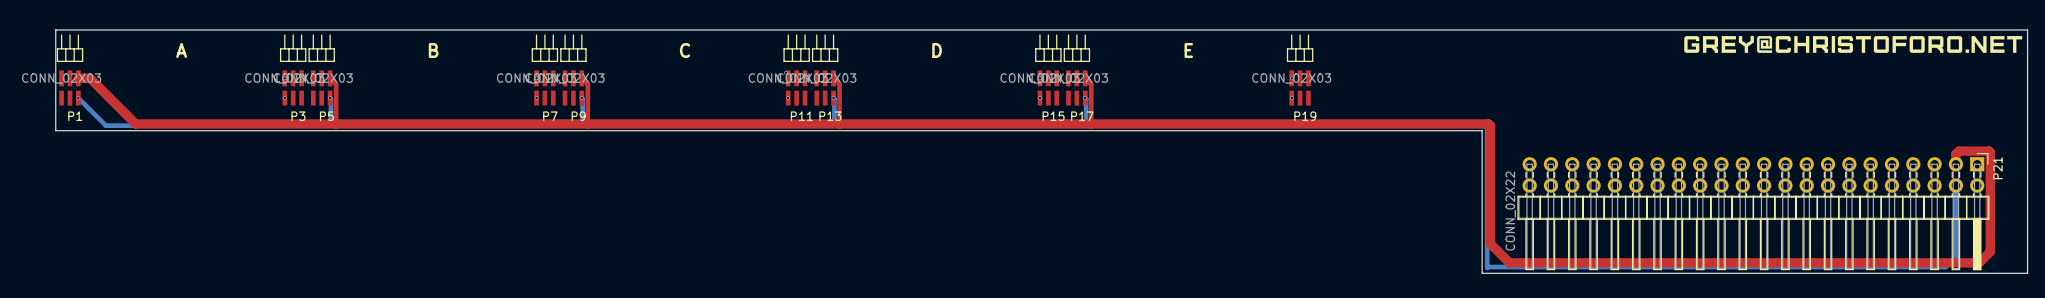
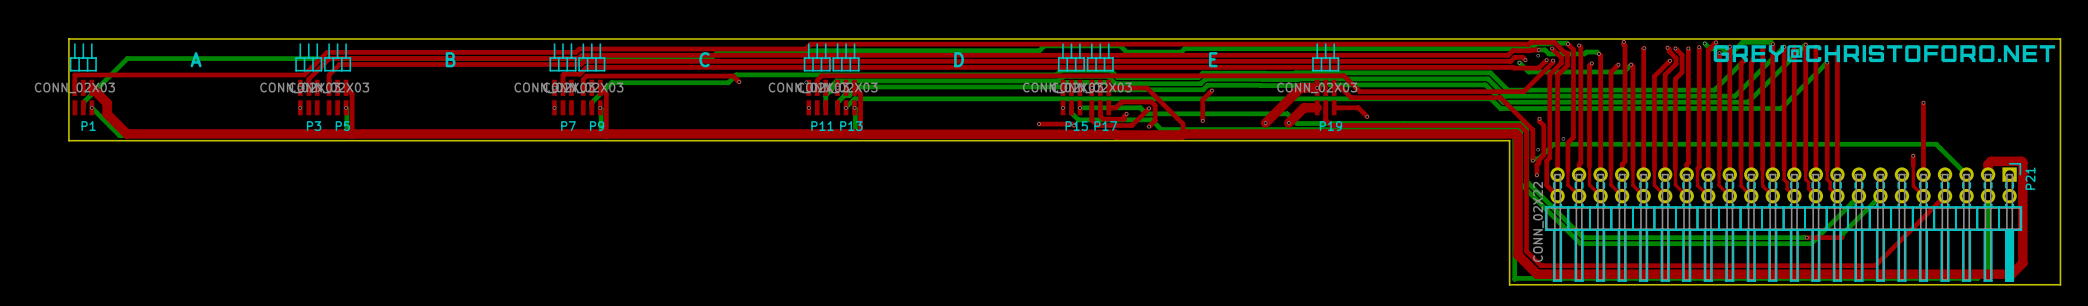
top track: none -> (1623, 41) (1625, 161) (1622, 164) (1622, 174)
via: none -> (1623, 41)
top track: none -> (1715, 42) (1708, 50) (1708, 174)
via: none -> (1715, 42)
bottom track: none -> (1704, 43) (1710, 48) (1721, 47) (1726, 52) (1732, 52) (1742, 42) (1770, 42) (1772, 44)
via: none -> (1704, 43)
bottom track: none -> (1567, 44) (1536, 43) (1532, 48) (1184, 48) (1181, 52) (1127, 53) (1120, 45) (1044, 45) (1039, 50) (719, 50) (711, 58) (127, 58) (83, 102) (83, 107)
top track: none -> (1567, 44) (1573, 49) (1573, 137) (1567, 142) (1567, 184) (1579, 196)
via: none -> (1567, 44)
top track: none -> (1772, 44) (1772, 174)
via: none -> (1772, 44)
bottom track: none -> (1805, 44) (1748, 102) (1502, 102) (1485, 84) (1207, 85) (1203, 89) (1112, 89) (1105, 82) (1066, 82) (1061, 86) (858, 86) (849, 95) (844, 95) (837, 102) (837, 107)
top track: none -> (1805, 44) (1805, 169)
via: none -> (1805, 44)
top track: none -> (1579, 45) (1580, 47) (1580, 162) (1579, 174)
via: none -> (1579, 45)
top track: none -> (1729, 46) (1729, 174)
via: none -> (1729, 46)
bottom track: none -> (1784, 46) (1735, 96) (1505, 96) (1488, 78) (1205, 79) (1200, 83) (1115, 83) (1108, 76) (1063, 76) (1059, 80) (836, 80) (825, 95) (825, 107)
top track: none -> (1784, 46) (1783, 169)
via: none -> (1784, 46)
top track: none -> (1794, 46) (1794, 174)
top track: none -> (1815, 46) (1815, 174)
top track: none -> (1667, 47) (1676, 58) (1676, 63) (1665, 74) (1665, 174)
via: none -> (1667, 47)
top track: none -> (1699, 47) (1699, 166) (1697, 168) (1697, 185) (1708, 196)
via: none -> (1699, 47)
top track: none -> (1762, 47) (1762, 169)
top track: none -> (1552, 48) (1561, 57) (1561, 63) (1549, 74) (1549, 157) (1546, 160) (1546, 185) (1557, 196)
via: none -> (1552, 48)
top track: none -> (1644, 48) (1643, 174)
via: none -> (1644, 48)
top track: none -> (1675, 48) (1682, 55) (1682, 72) (1675, 79) (1675, 184) (1686, 196)
via: none -> (1675, 48)
top track: none -> (1688, 48) (1688, 162) (1686, 174)
via: none -> (1688, 48)
bottom track: none -> (1538, 49) (1545, 49) (1549, 53) (1584, 53) (1586, 52) (1597, 52) (1598, 53)
top track: none -> (1538, 49) (1512, 50) (1508, 55) (581, 55) (578, 58) (329, 58) (308, 79) (308, 87)
via: none -> (1538, 49)
top track: none -> (1837, 51) (1837, 174)
top track: none -> (1719, 53) (1719, 185) (1729, 196)
via: none -> (1719, 53)
top track: none -> (1598, 53) (1600, 55) (1600, 174)
via: none -> (1598, 53)
via: none -> (1538, 55)
bottom track: none -> (1745, 59) (1714, 90) (1507, 90) (1490, 72) (1202, 73) (1198, 77) (1117, 77) (1110, 70) (1061, 70) (1056, 74) (736, 74) (728, 82) (611, 82) (591, 102) (591, 107)
top track: none -> (1745, 59) (1741, 63) (1741, 185) (1751, 196)
top track: none -> (1752, 59) (1751, 174)
top track: none -> (1525, 60) (1522, 57) (1514, 57) (1510, 61) (584, 61) (581, 64) (339, 64) (329, 75) (329, 87)
via: none -> (1525, 60)
top track: none -> (1546, 60) (1538, 68) (586, 67) (579, 74) (563, 74) (563, 87)
via: none -> (1546, 60)
top track: none -> (1553, 60) (1523, 91) (1359, 91) (1343, 75) (821, 75) (817, 80) (817, 87)
via: none -> (1553, 60)
top track: none -> (1670, 60) (1654, 76) (1654, 185) (1665, 196)
via: none -> (1670, 60)
bottom track: none -> (1519, 62) (1528, 71) (1623, 71) (1631, 64)
via: none -> (1519, 62)
bottom track: none -> (1827, 62) (1781, 108) (1500, 108) (1490, 98) (854, 98) (846, 107)
top track: none -> (1827, 62) (1827, 169)
via: none -> (1827, 62)
top track: none -> (1591, 63) (1589, 65) (1589, 184) (1600, 196)
via: none -> (1591, 63)
top track: none -> (1618, 64) (1611, 72) (1611, 184) (1622, 196)
via: none -> (1618, 64)
top track: none -> (1631, 64) (1632, 66) (1632, 185) (1643, 196)
via: none -> (1631, 64)
top track: none -> (739, 82) (733, 76) (586, 76) (583, 79) (583, 87)
via: none -> (739, 82)
top track: none -> (74, 87) (74, 75) (304, 75) (327, 52) (576, 52) (579, 49) (805, 49) (810, 44) (1528, 44) (1530, 42) (1554, 42) (1565, 52) (1567, 52) (1567, 65) (1557, 75) (1557, 174)
top track: (78, 78) (90, 78) (135, 123) -> (91, 87) (107, 103) (107, 114) (126, 133) (149, 133)
via: none -> (837, 87)
via: (1039, 78) -> none
via: none -> (1091, 87)
top track: (1085, 78) (1091, 84) (1091, 123) -> none
top track: none -> (1317, 87) (1300, 87) (1265, 123)
top track: none -> (1334, 87) (1341, 87) (1351, 97) (1500, 97) (1532, 129) (1532, 160)
top track: none -> (1211, 90) (1202, 99) (1202, 120)
via: none -> (1211, 90)
top track: none -> (1923, 102) (1923, 174)
via: none -> (1923, 102)
via: none -> (846, 107)
bottom track: none -> (1071, 107) (1071, 112) (1078, 119) (1151, 119) (1161, 129) (1518, 129) (1520, 131) (1520, 183) (1580, 243) (1811, 243) (1858, 196)
bottom track: none -> (1079, 107) (1140, 107) (1146, 113) (1287, 113) (1296, 123) (1524, 123) (1526, 125) (1526, 181) (1583, 237) (1806, 237)
via: none -> (1079, 107)
top track: none -> (1091, 107) (1091, 120) (1097, 125) (1131, 125) (1149, 108)
top track: none -> (1100, 107) (1100, 115) (1103, 119) (1124, 119) (1126, 114)
bottom track: (1085, 98) (1086, 125) -> none
top track: none -> (1108, 107) (1115, 107) (1121, 101) (1151, 101) (1155, 105) (1155, 120) (1149, 126)
via: (1085, 98) -> none
via: none -> (1149, 108)
top track: none -> (1317, 107) (1304, 107) (1288, 123)
via: (1291, 98) -> none
top track: none -> (1325, 107) (1325, 120) (1331, 125) (1519, 125) (1526, 132) (1526, 251) (1540, 265) (1875, 265) (1945, 196)
top track: none -> (1334, 107) (1358, 107) (1367, 116)
via: none -> (1126, 114)
via: none -> (1367, 116)
top track: none -> (1539, 118) (1543, 125) (1543, 155) (1536, 165) (1536, 175)
via: none -> (1539, 118)
via: none -> (1202, 120)
via: none -> (1265, 123)
via: none -> (1288, 123)
top track: none -> (1039, 124) (1074, 125)
via: none -> (1039, 124)
via: none -> (1074, 125)
via: none -> (1149, 126)
top track: (839, 123) (1158, 123) -> (860, 133) (1183, 133) (1183, 124) (1146, 87) (1108, 87)
via: none -> (1563, 138)
via: none -> (1538, 149)
top track: none -> (1913, 155) (1913, 165)
via: none -> (1913, 155)
bottom track: none -> (1532, 160) (1539, 158) (1553, 144) (1936, 144) (1966, 174)
via: none -> (1532, 160)
top track: none -> (1913, 165) (1913, 185) (1923, 196)
top track: none -> (1762, 169) (1762, 185) (1772, 196)
top track: none -> (1784, 169) (1784, 179) (1787, 182) (1787, 188) (1794, 196)
top track: none -> (1805, 169) (1808, 188) (1815, 196)
top track: none -> (1827, 169) (1830, 188) (1837, 196)
via: none -> (1536, 175)
bottom track: none -> (1880, 196) (1842, 234) (1842, 237)
top track: none -> (1806, 237) (1842, 237)
via: none -> (1806, 237)

